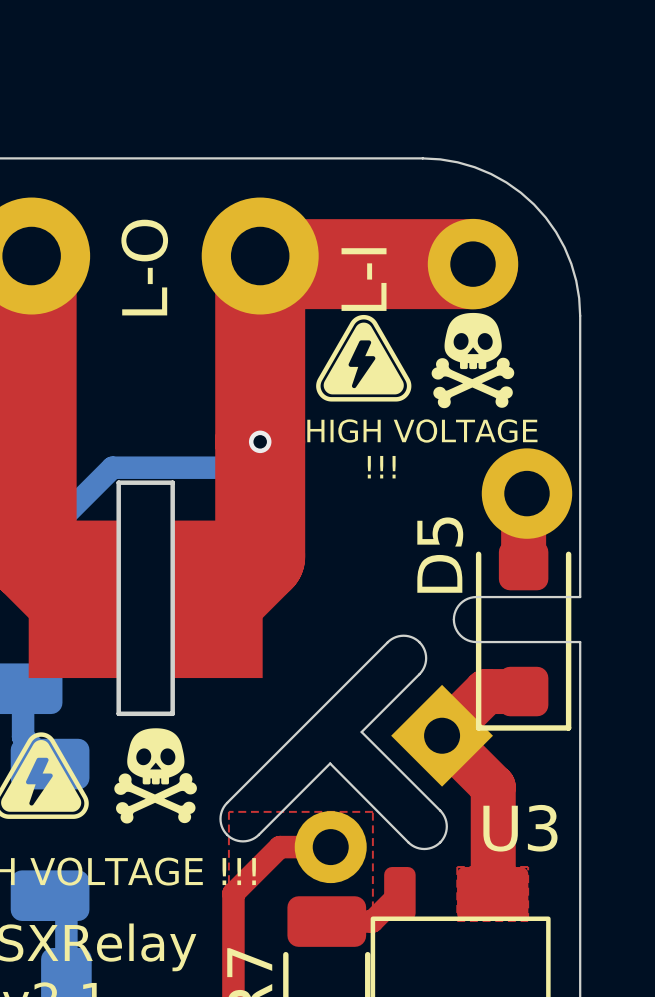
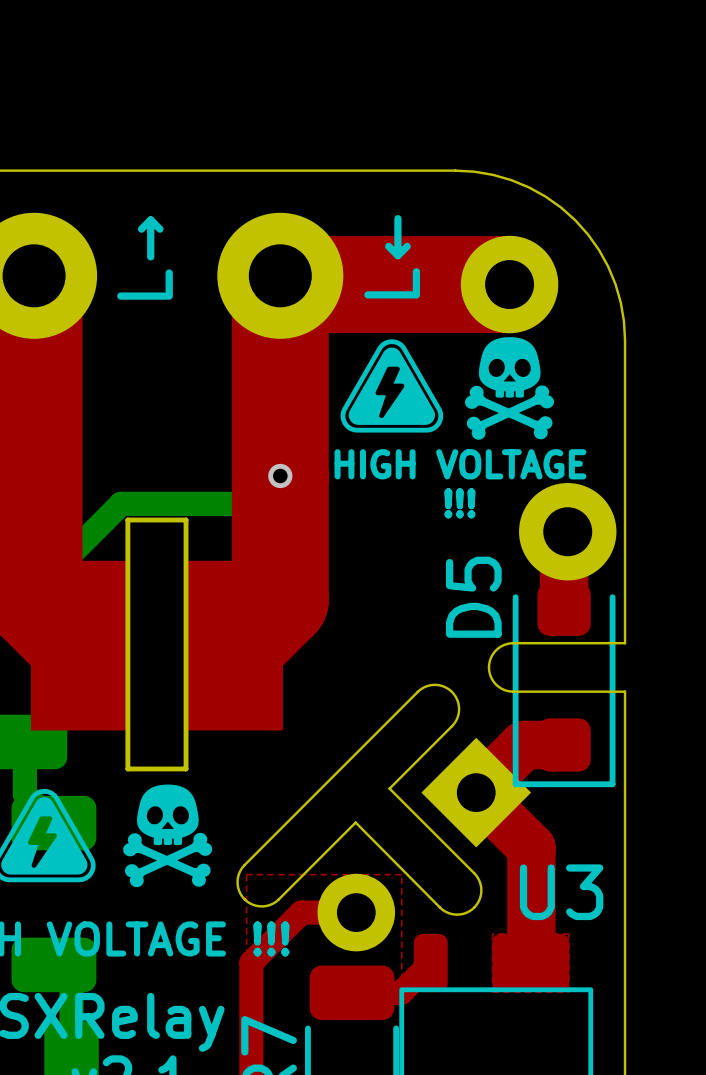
text: L-O (144, 267) -> L→ (144, 258)
text: L-I (364, 279) -> L← (392, 256)

